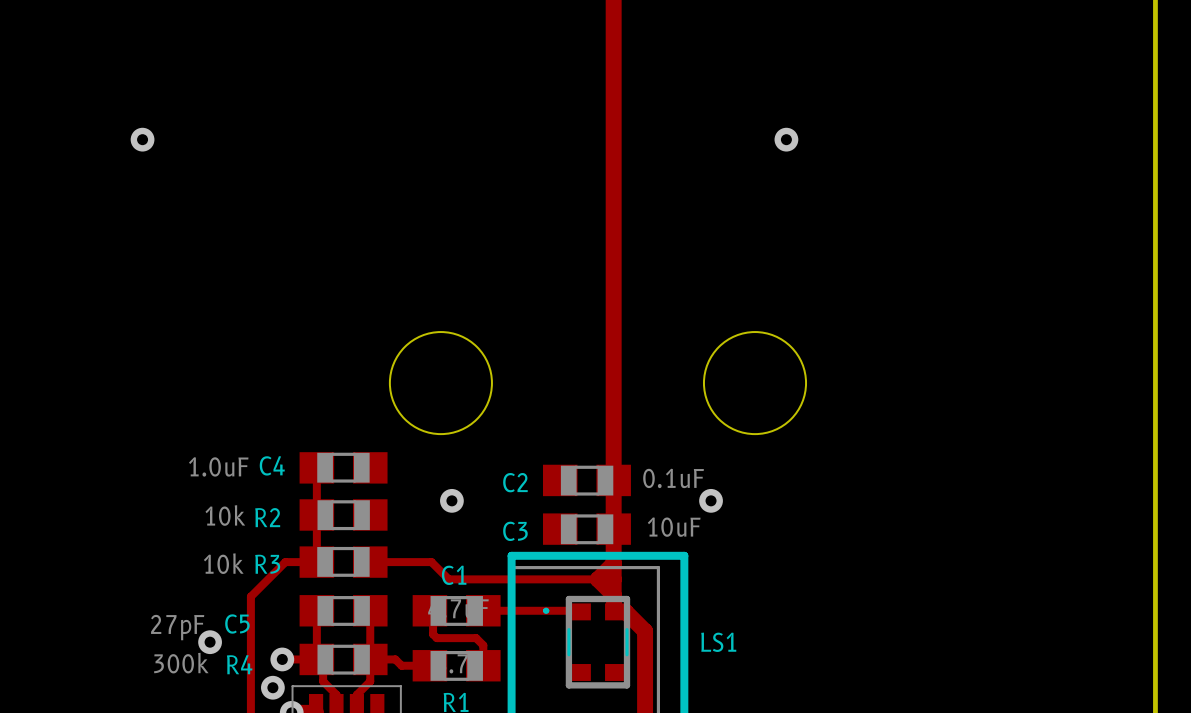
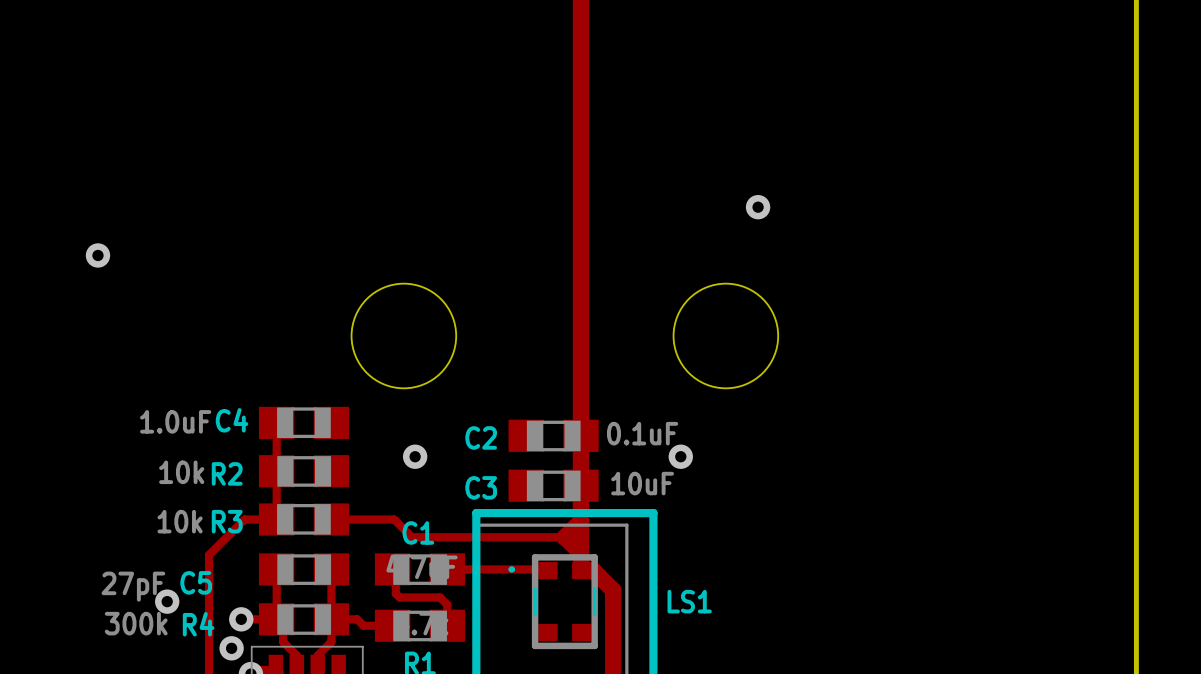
via: (142, 139) -> none
via position: (786, 139) -> (758, 207)
via: none -> (97, 255)

